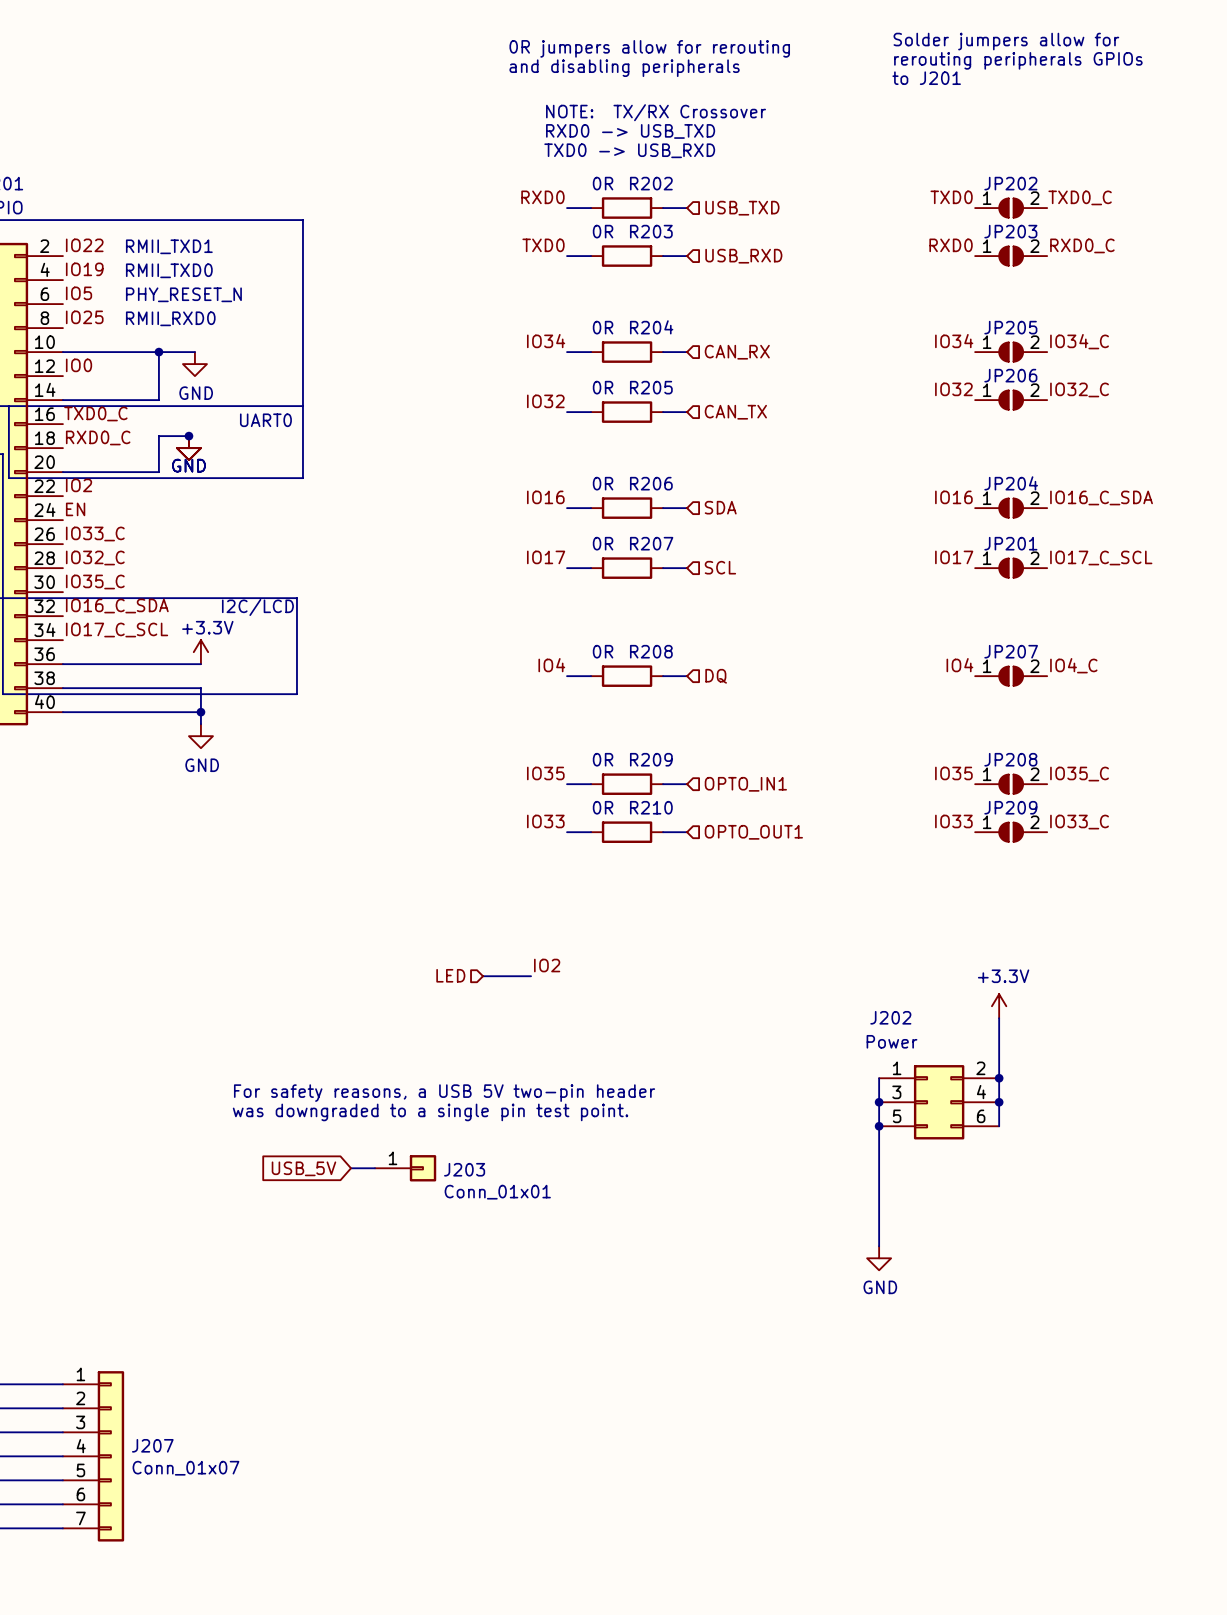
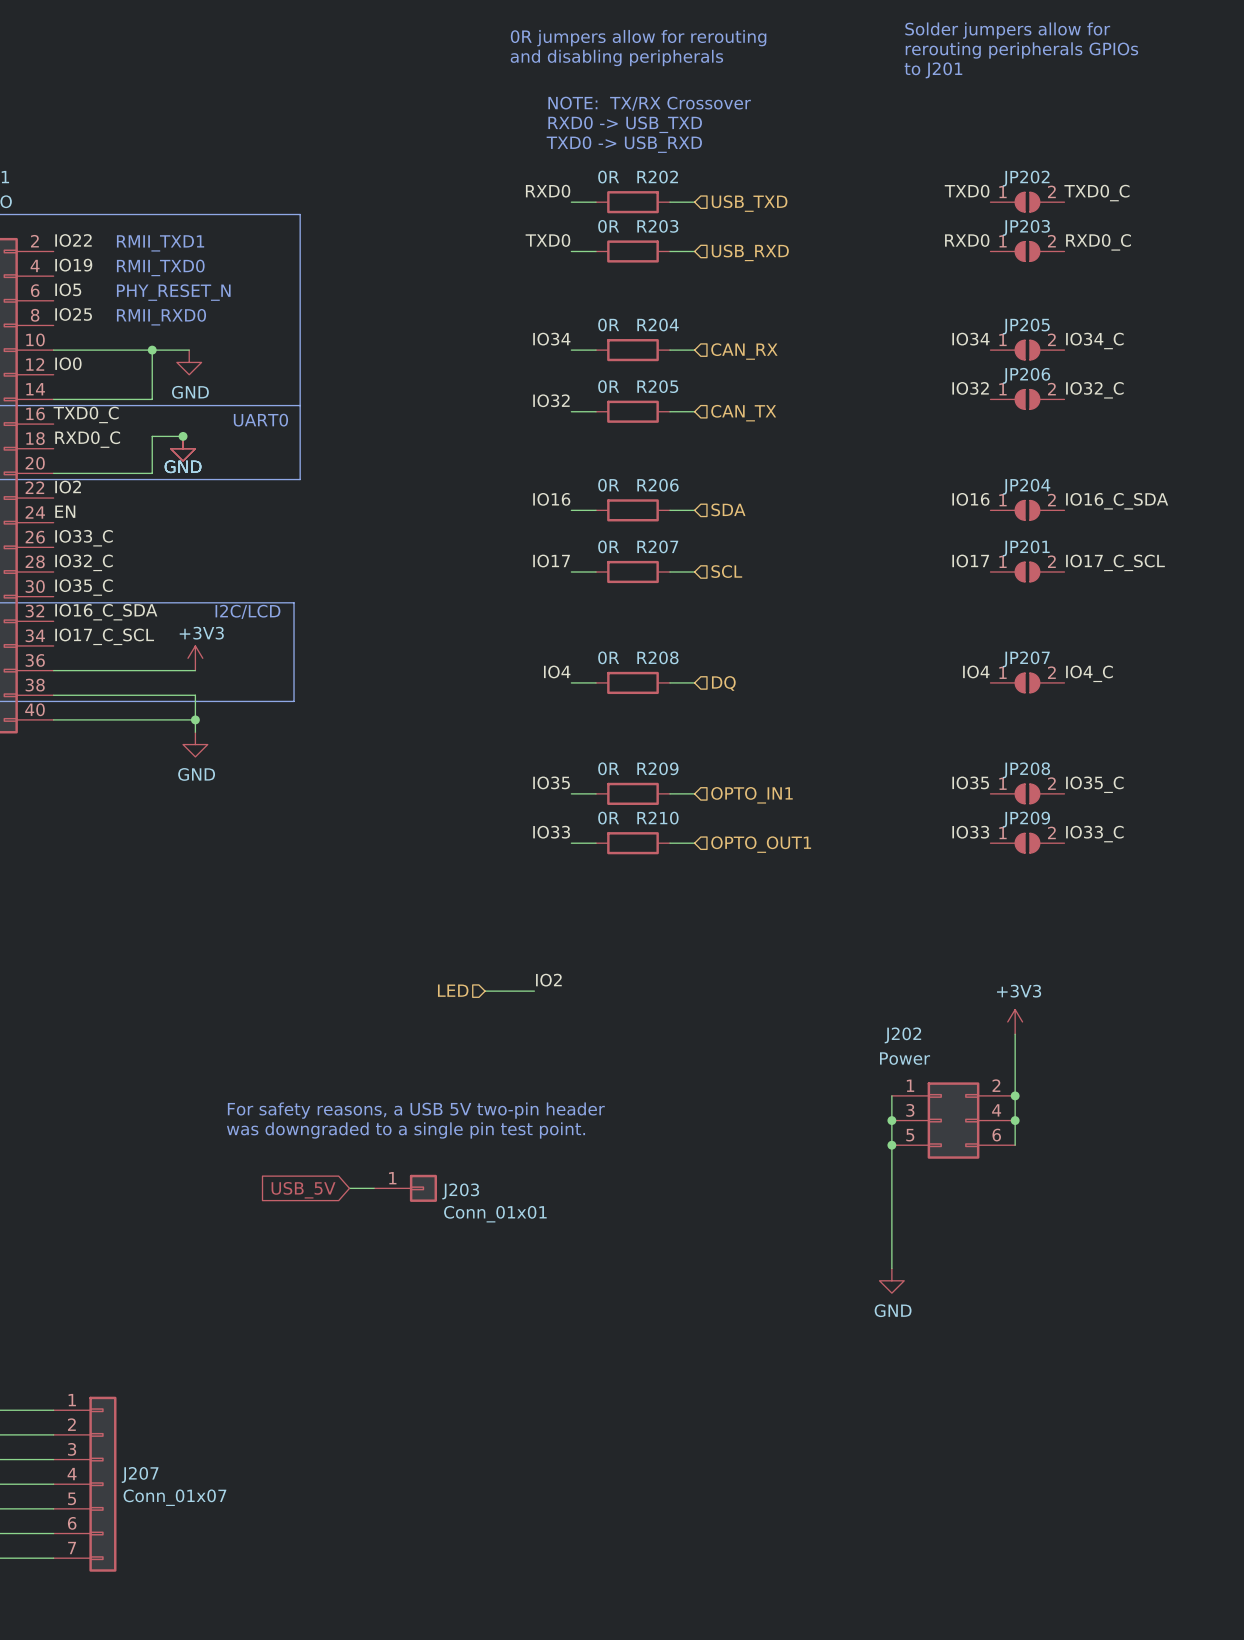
power symbol: +3.3V (200, 652) -> +3V3 (195, 658)
power symbol: +3.3V (999, 1006) -> +3V3 (1015, 1021)

